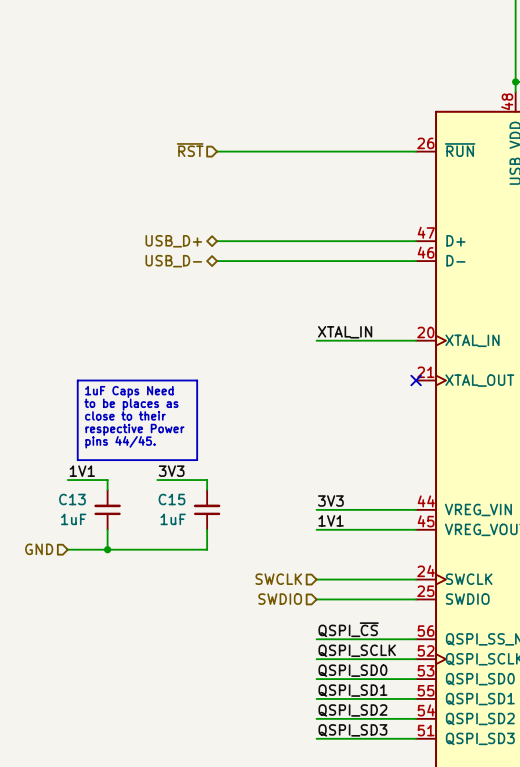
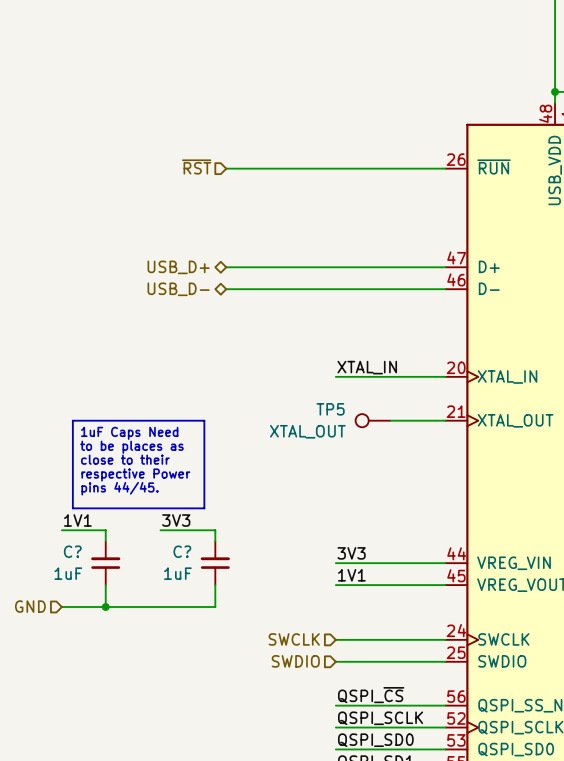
TP5: none -> XTAL_OUT (373, 420)
wire: none -> (390, 420) (445, 420)
no-connect mark: (416, 380) -> none
C13 name: C13 (72, 499) -> C? (72, 551)
C15 name: C15 (171, 499) -> C? (182, 551)

